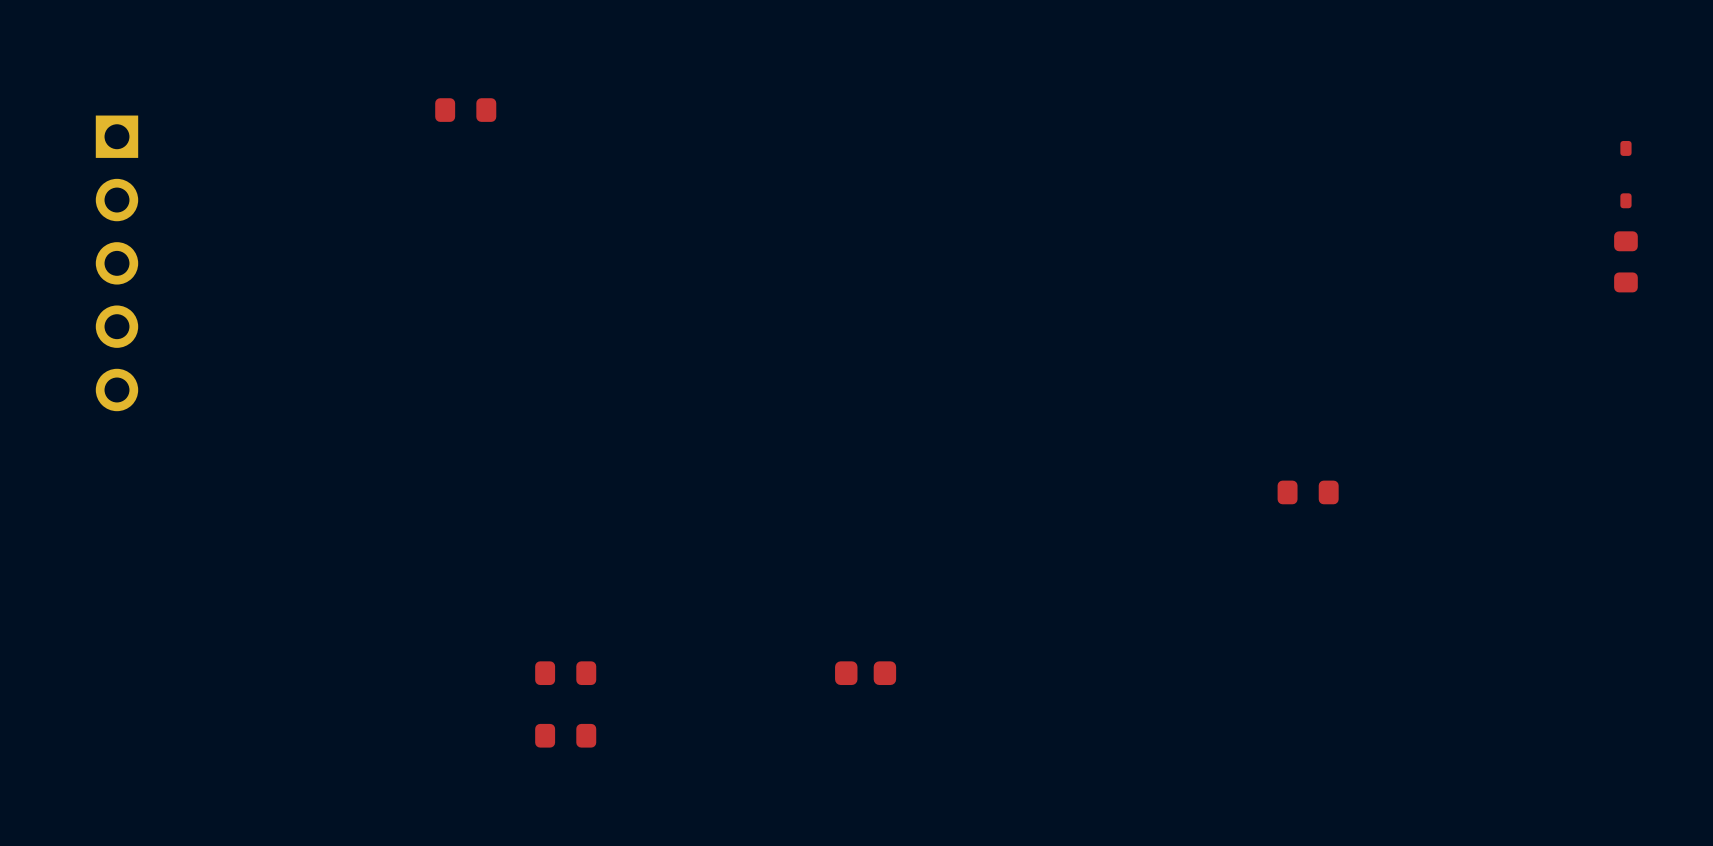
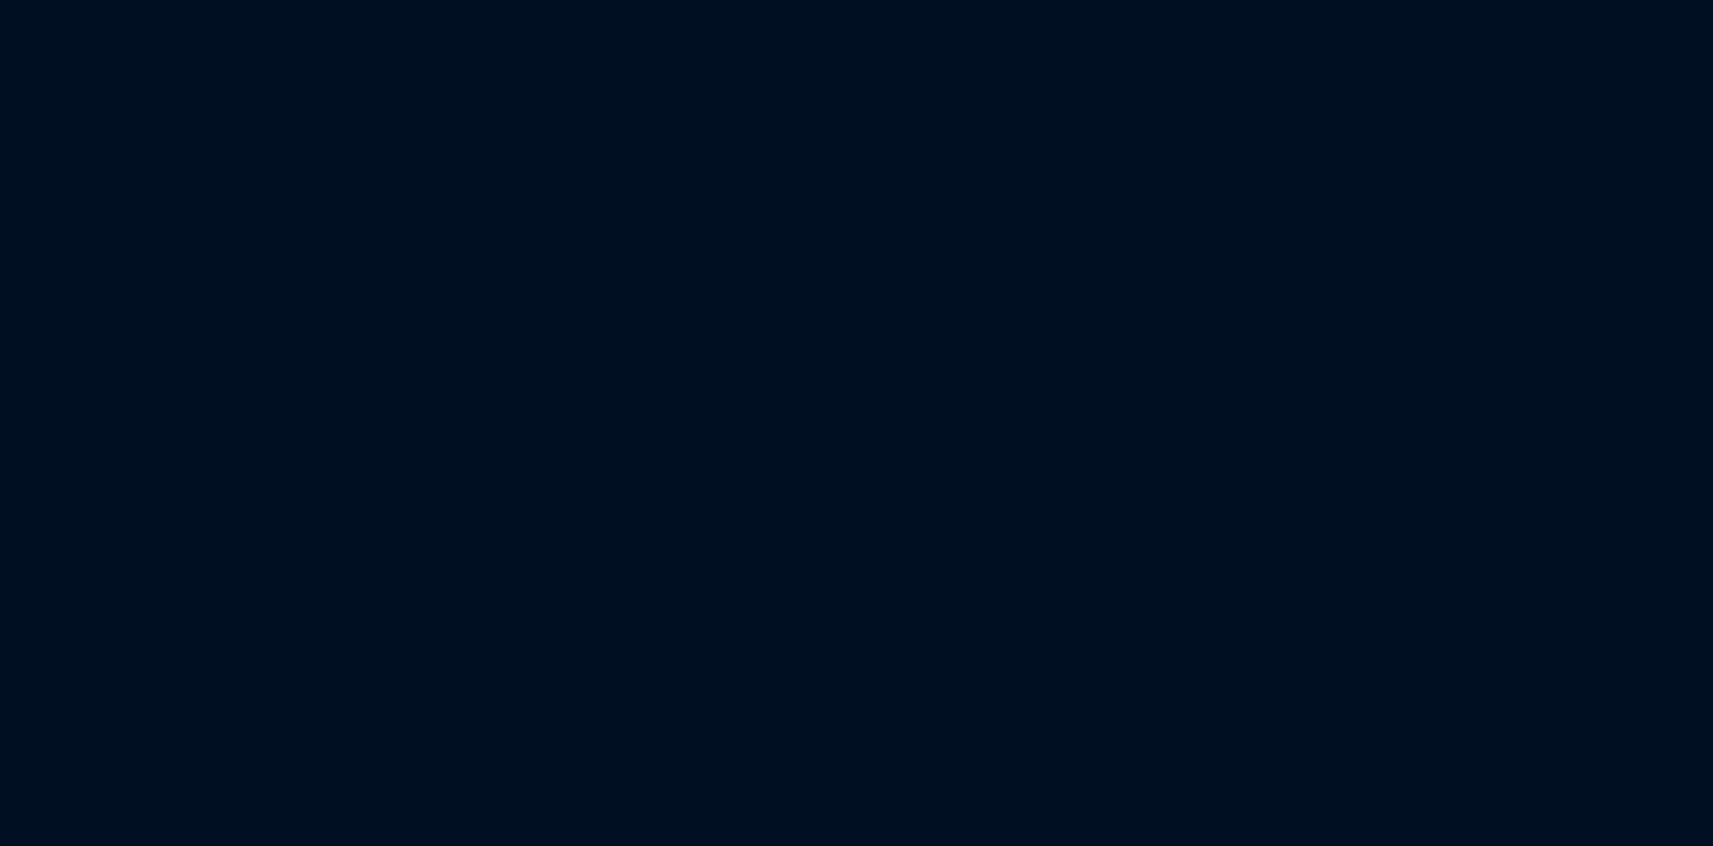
part: (465, 110) -> none
part: (1625, 174) -> none
part: (1625, 261) -> none
part: (116, 263) -> none
part: (1308, 492) -> none
part: (565, 673) -> none
part: (865, 673) -> none
part: (565, 735) -> none

